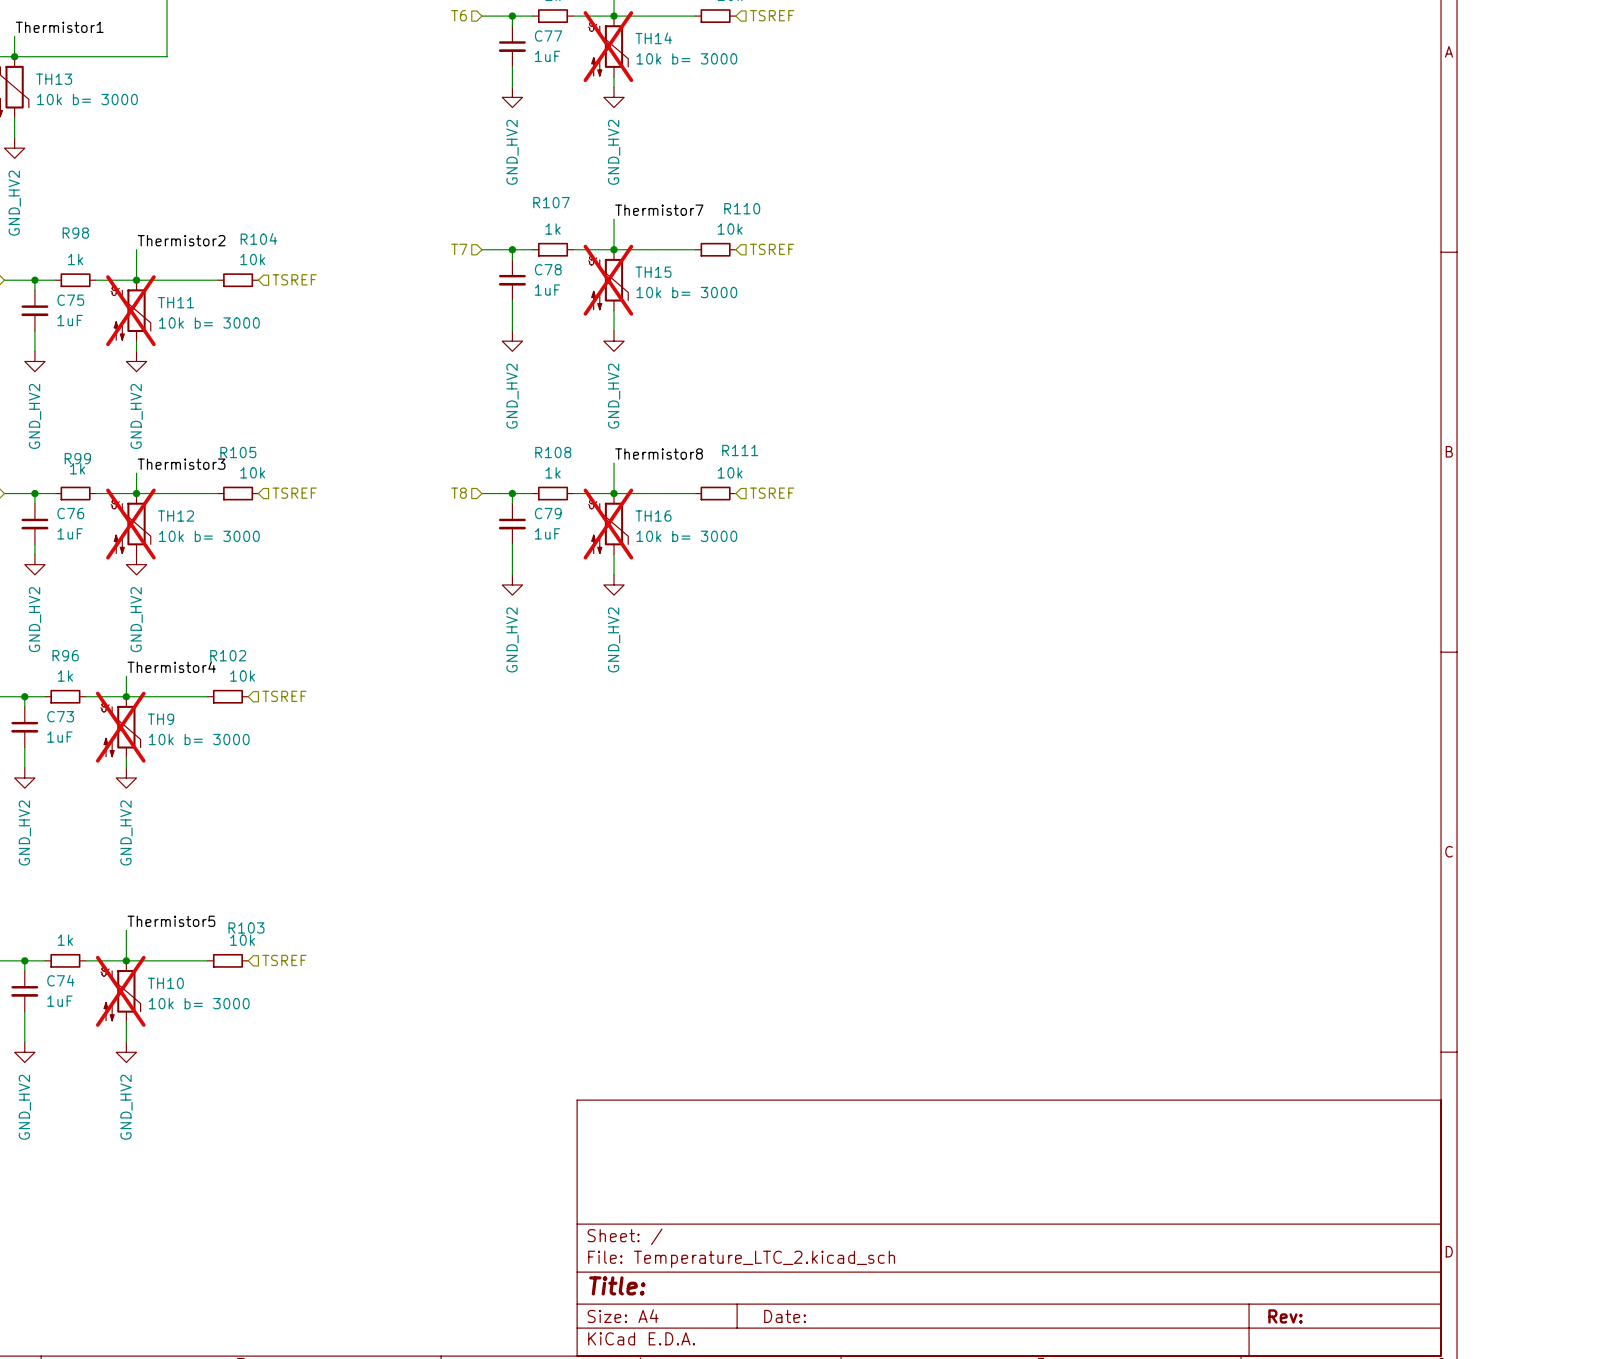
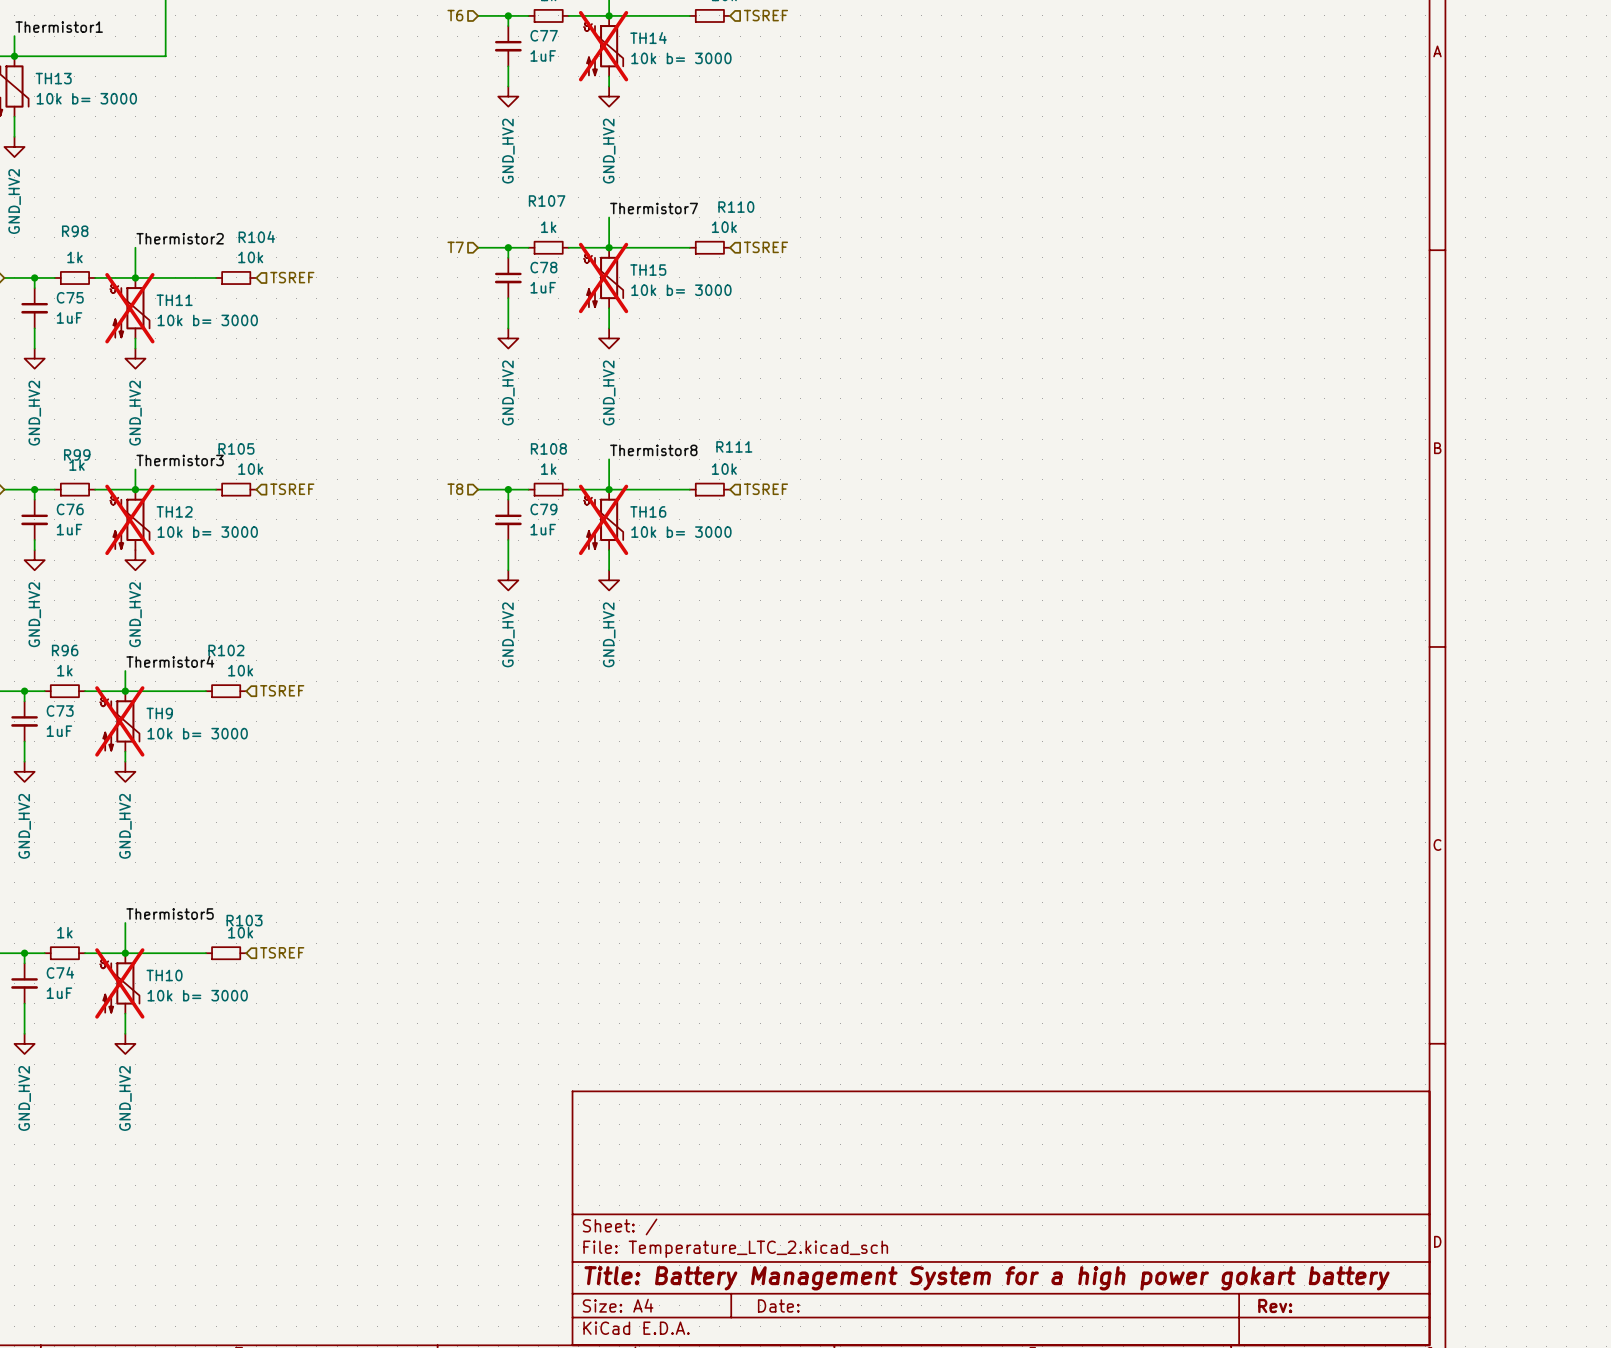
title block: Title: (617, 1285) -> Title: Battery Management System for a high power gokart battery (987, 1278)

